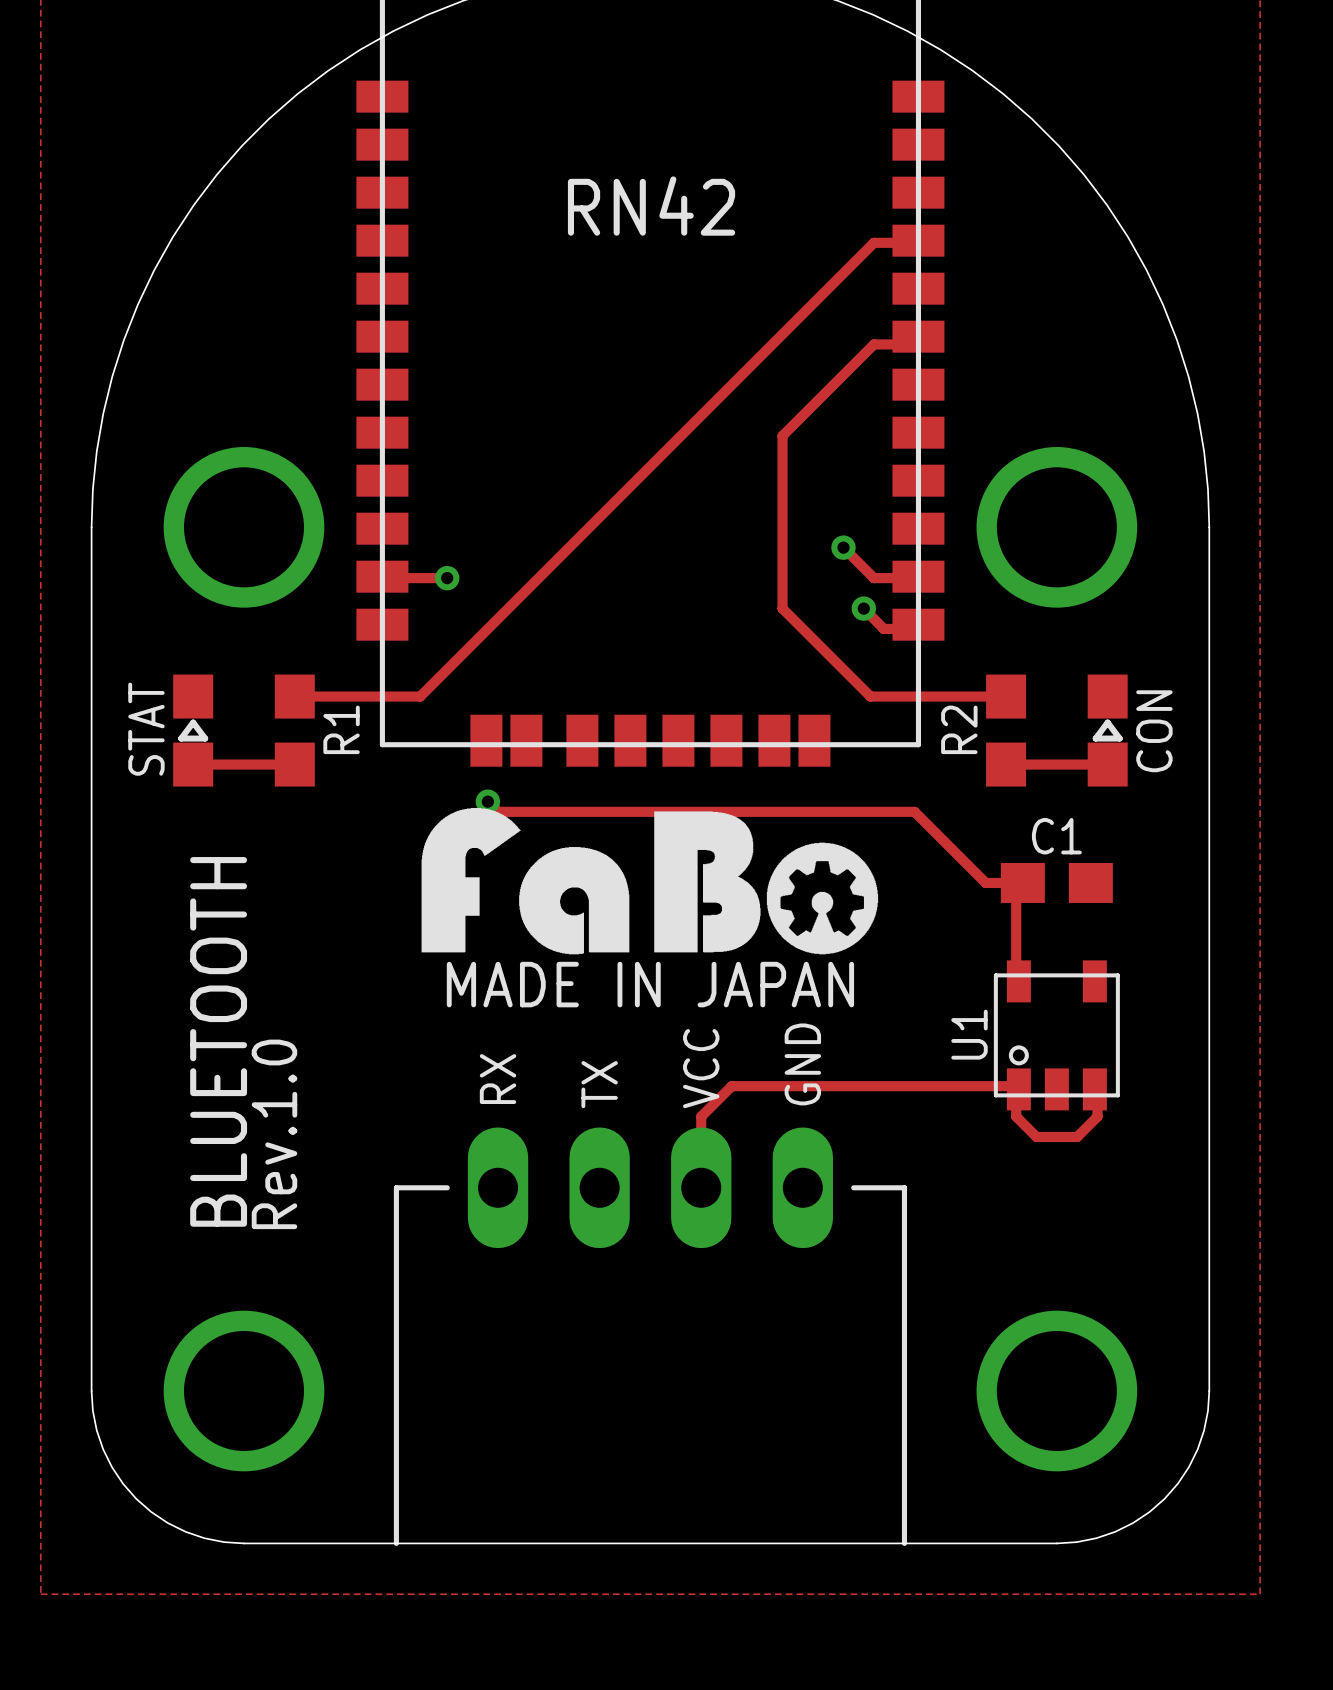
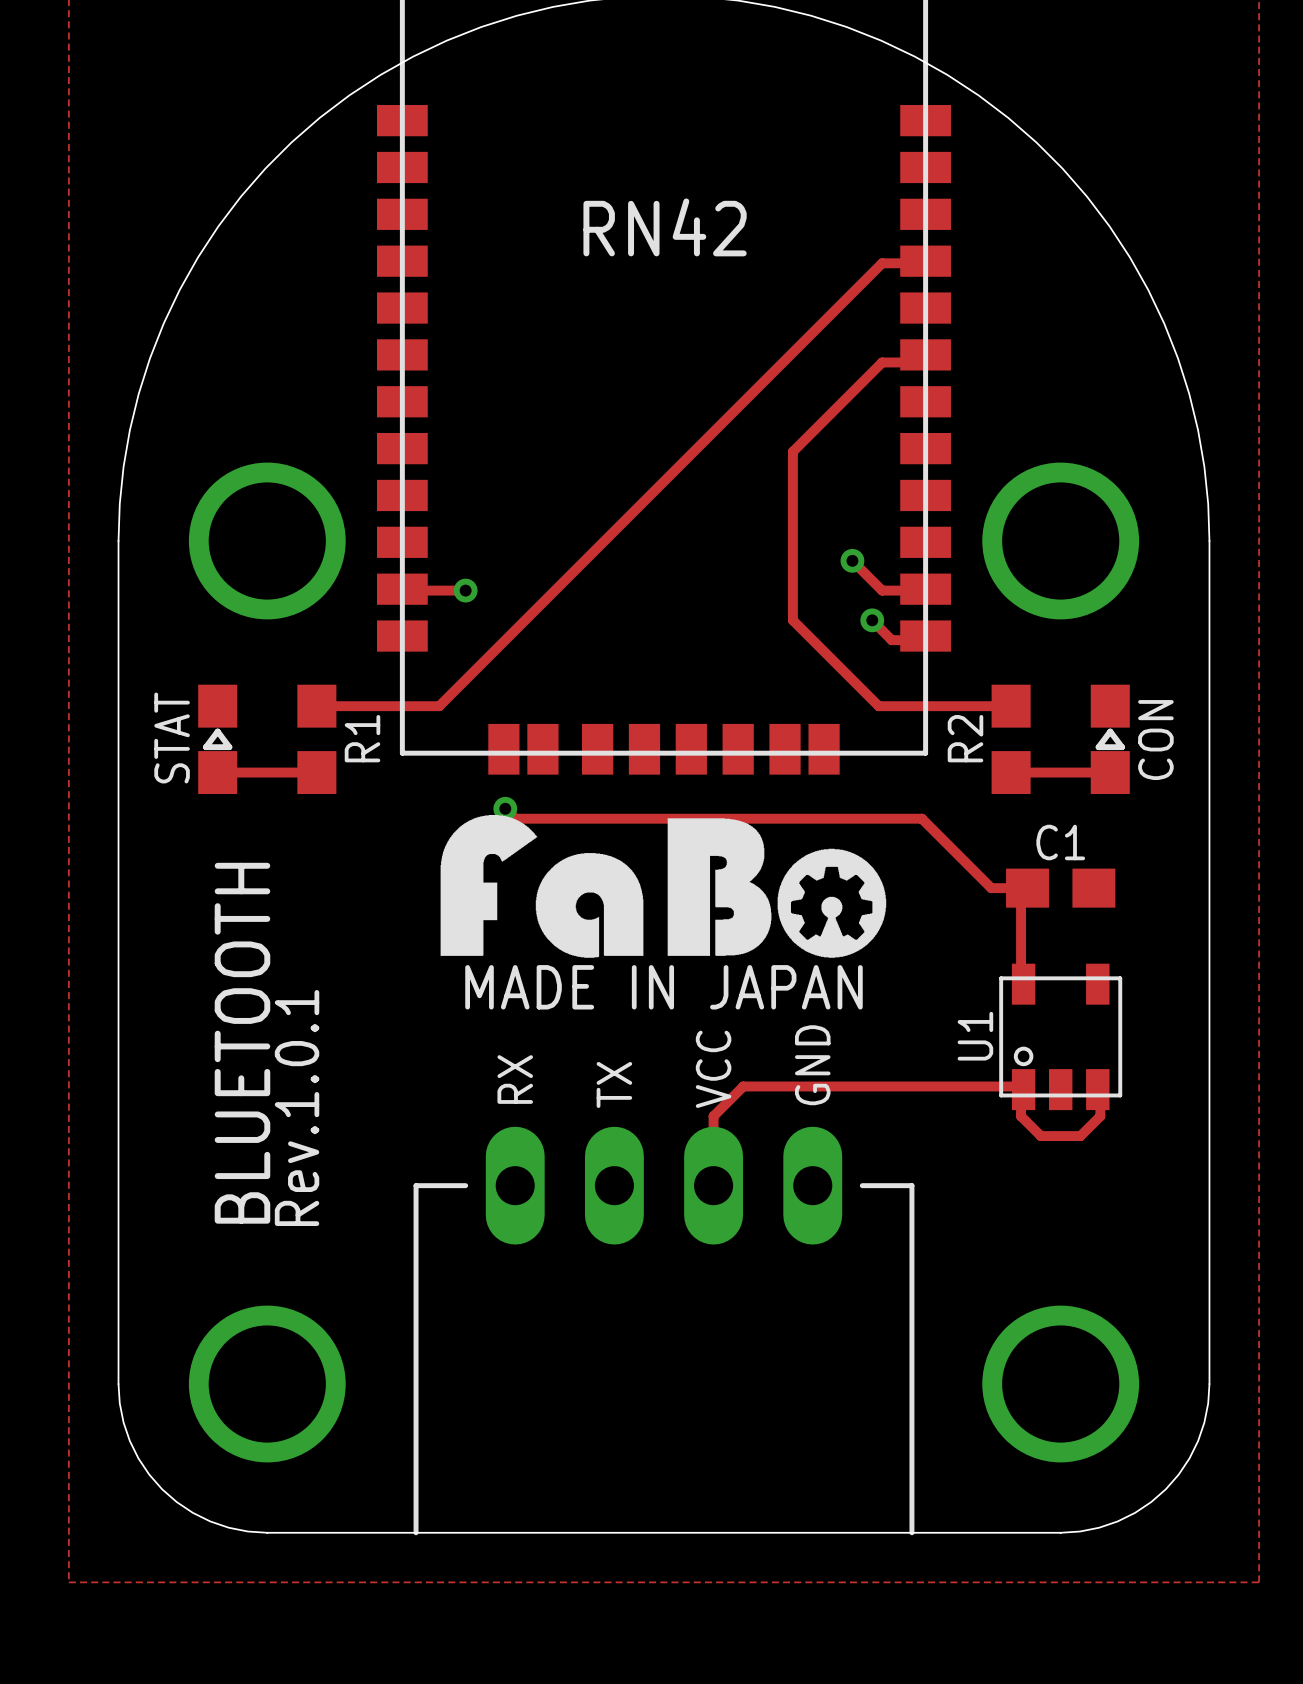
text: Rev.1.0 (274, 1134) -> Rev.1.0.1 (297, 1108)

